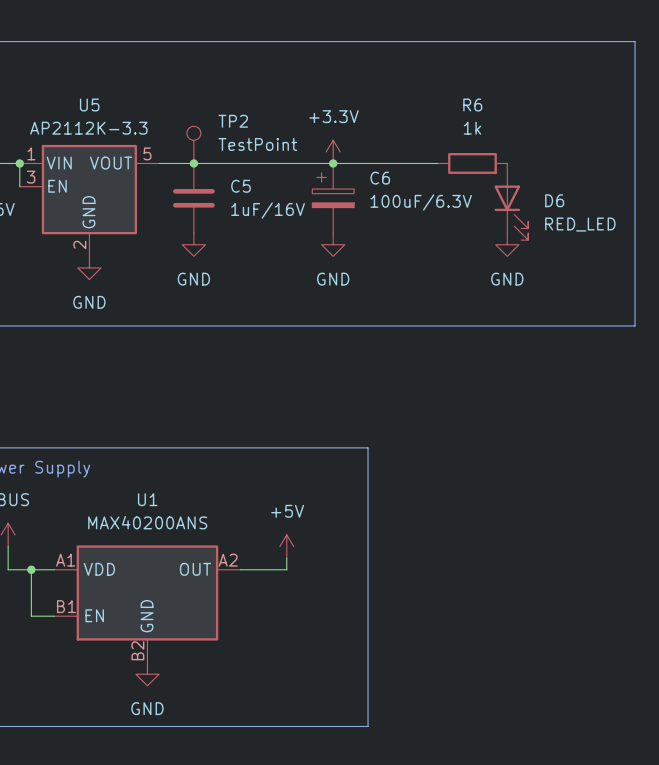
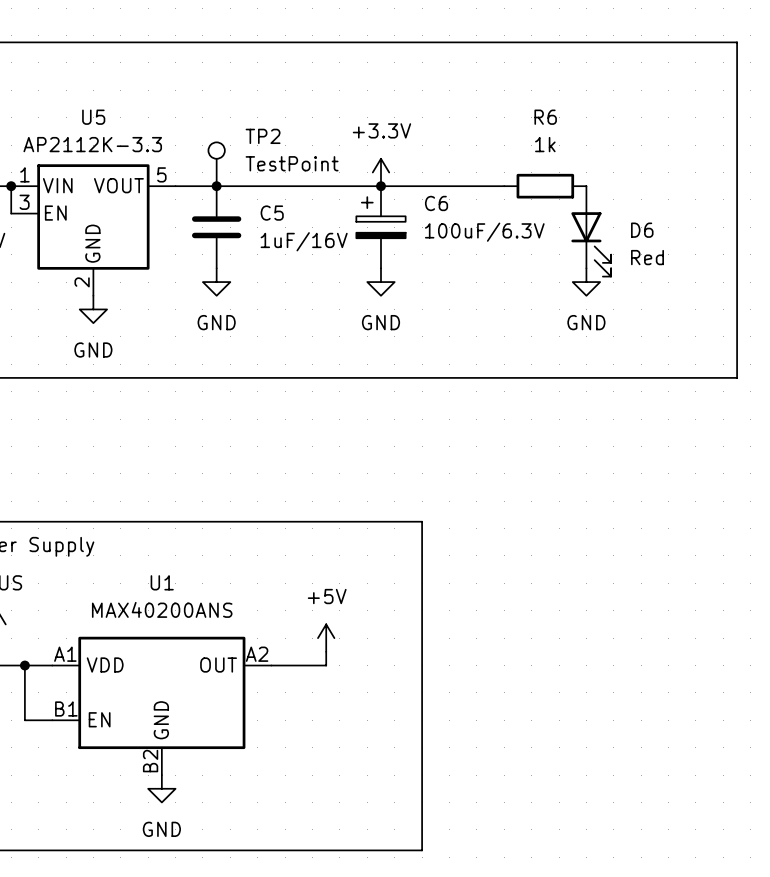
D6 value: RED_LED (580, 224) -> Red (647, 257)

